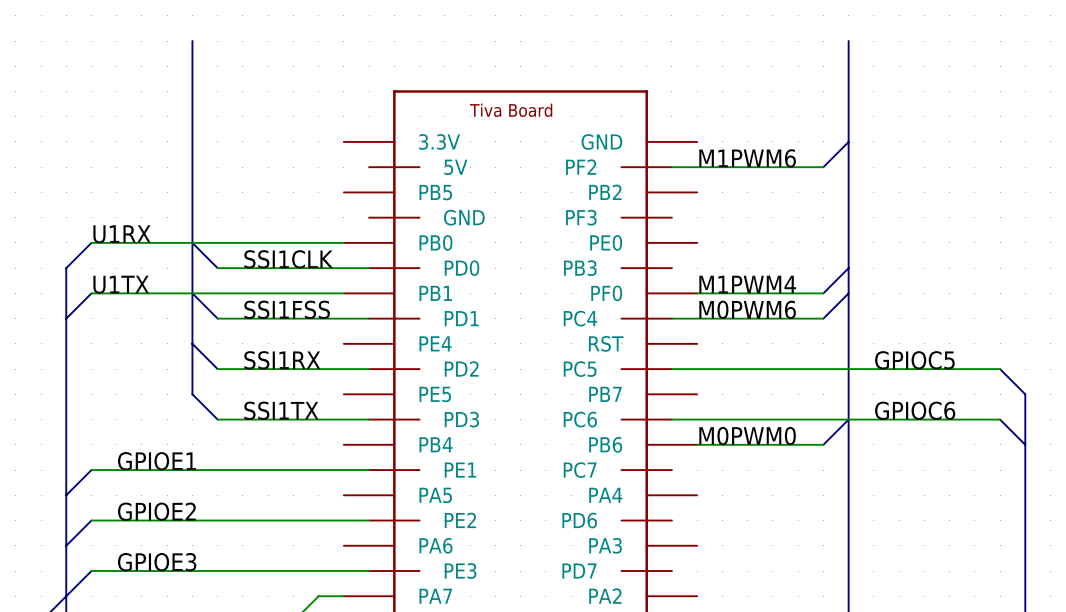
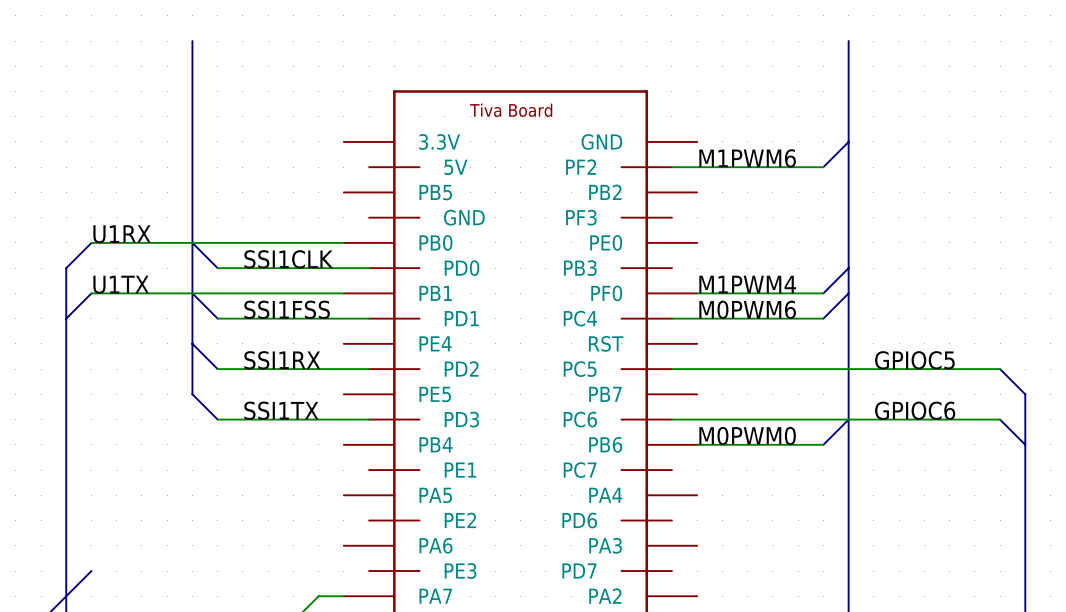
label: GPIOE1 (156, 461) -> none
bus: (91, 470) (66, 495) -> none
wire: (91, 470) (369, 470) -> none
label: GPIOE2 (156, 511) -> none
bus: (91, 520) (66, 545) -> none
wire: (91, 520) (369, 520) -> none
label: GPIOE3 (157, 562) -> none
wire: (91, 571) (369, 571) -> none

